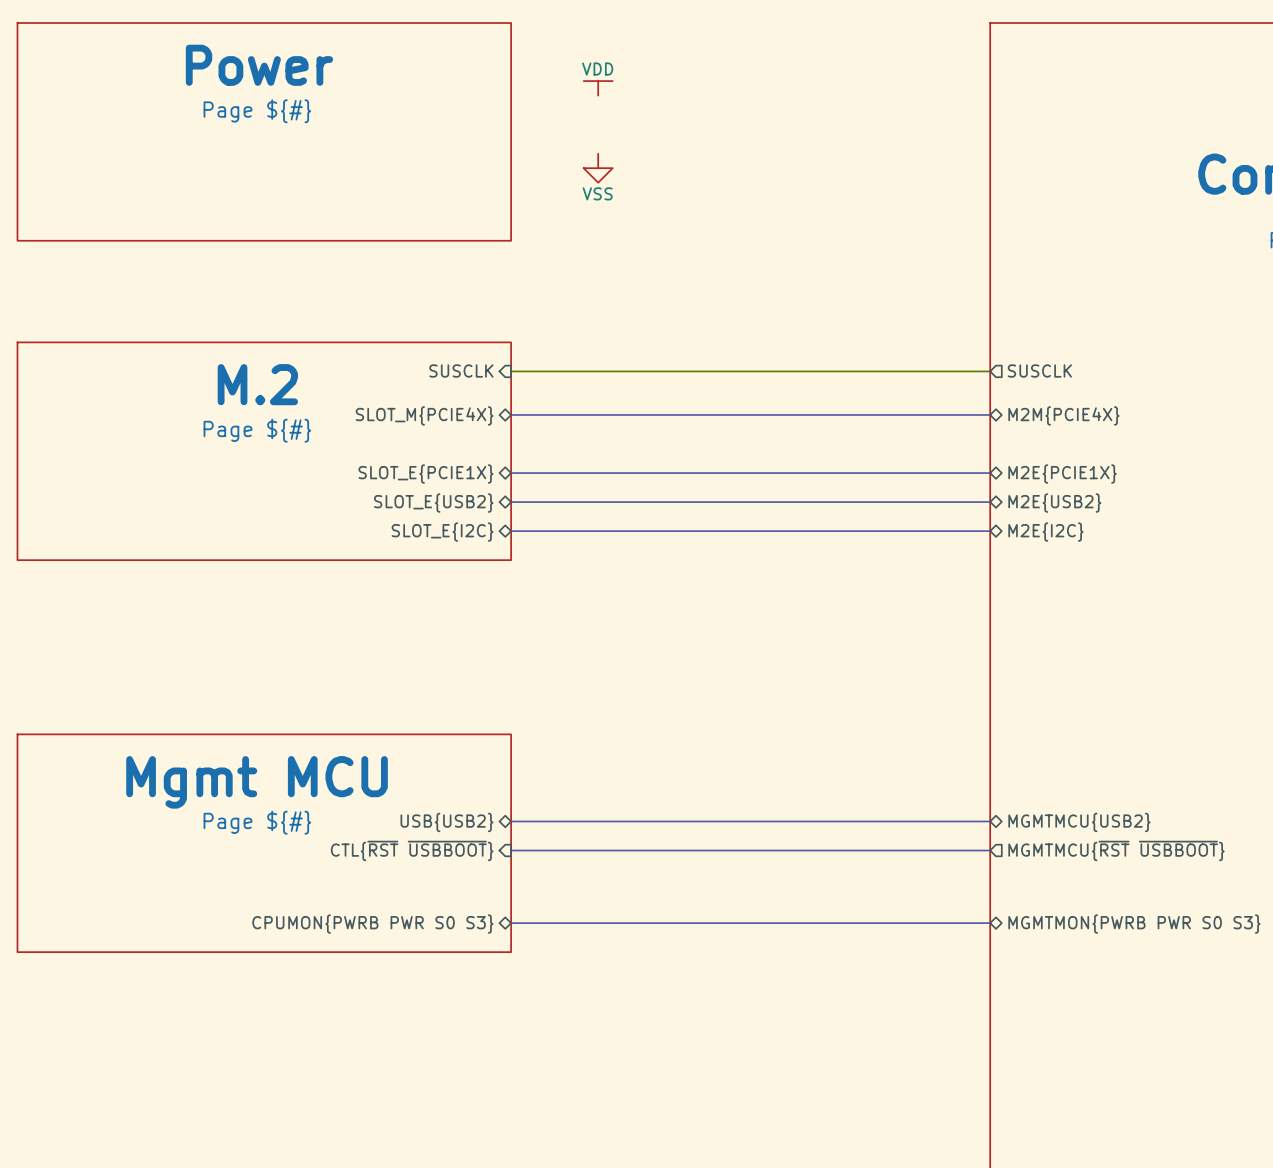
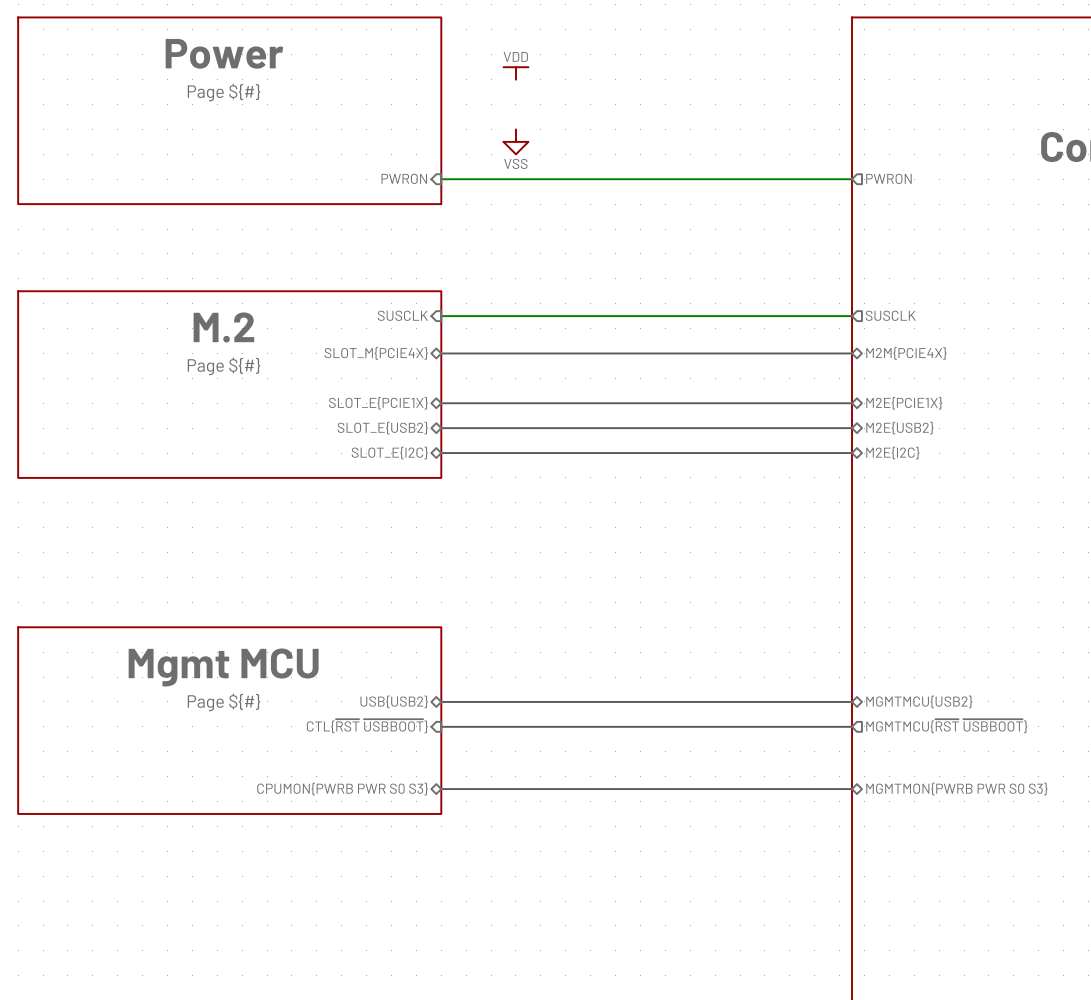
sheet pin: none -> PWRON (404, 178)
wire: none -> (441, 179) (852, 179)
sheet pin: none -> PWRON (888, 178)

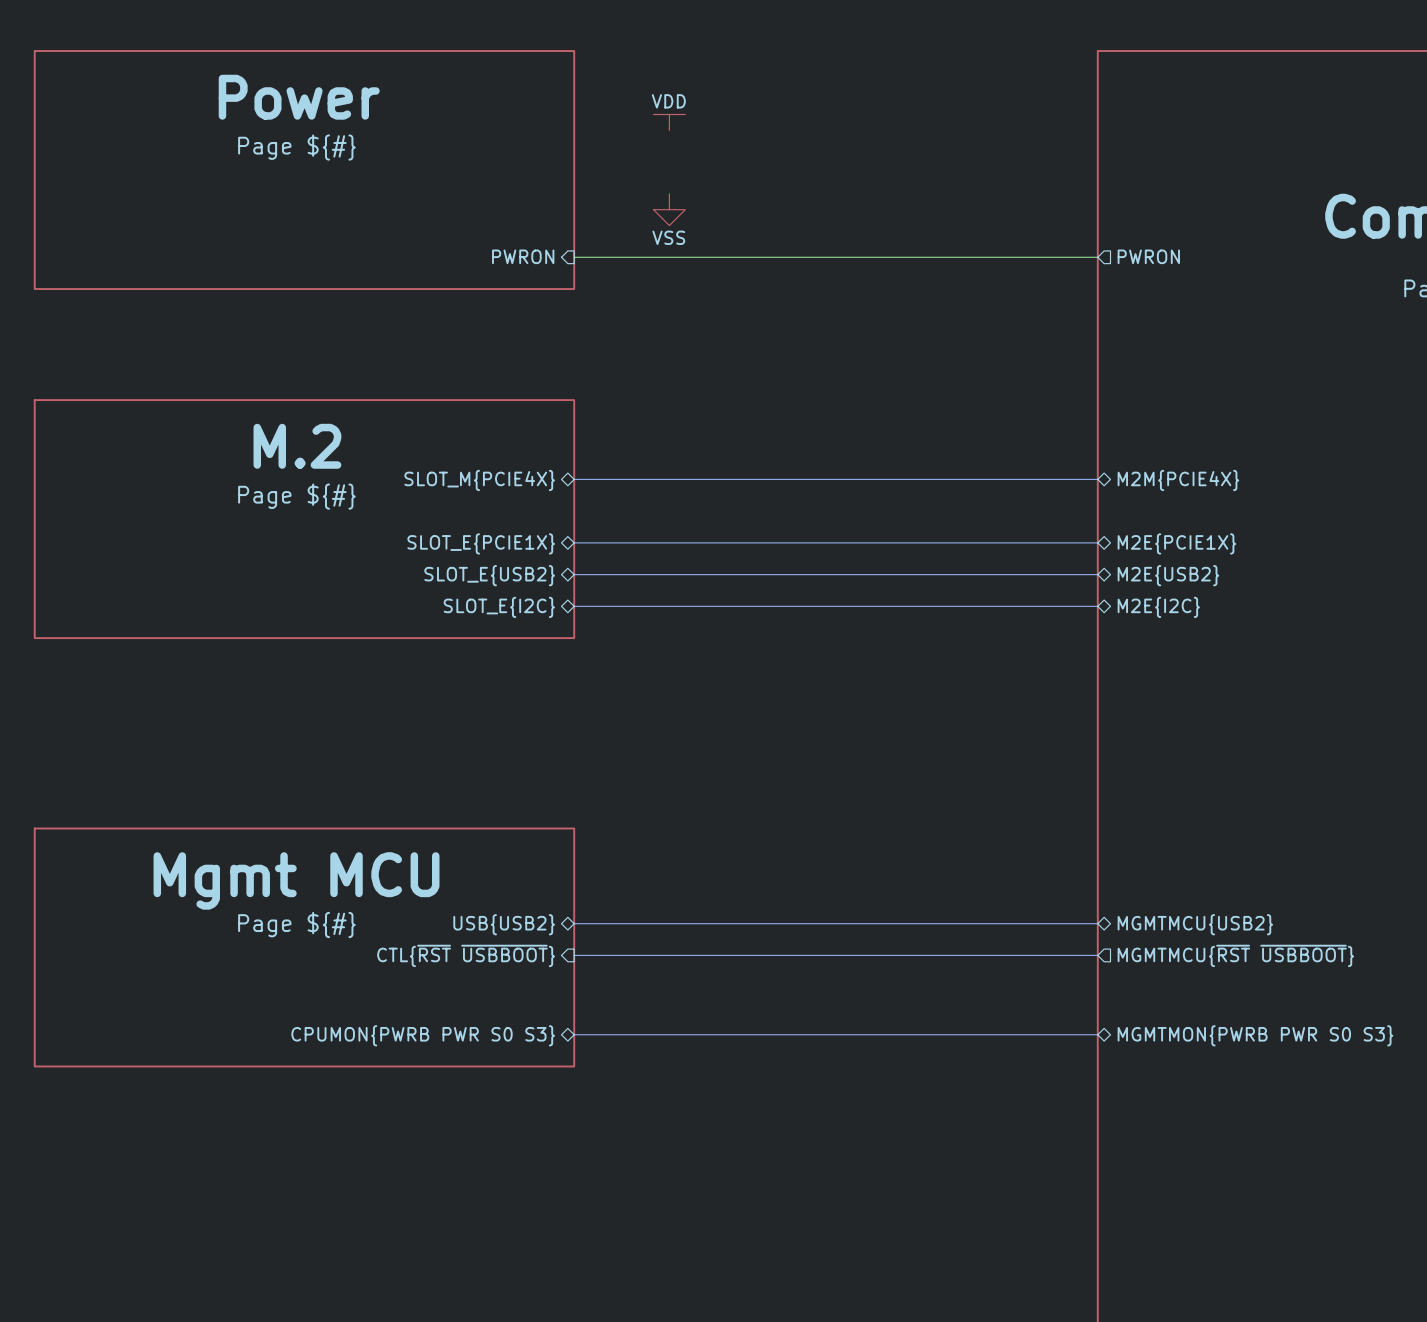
sheet pin: SUSCLK (402, 315) -> none
sheet pin: SUSCLK (890, 315) -> none
wire: (441, 316) (852, 316) -> none

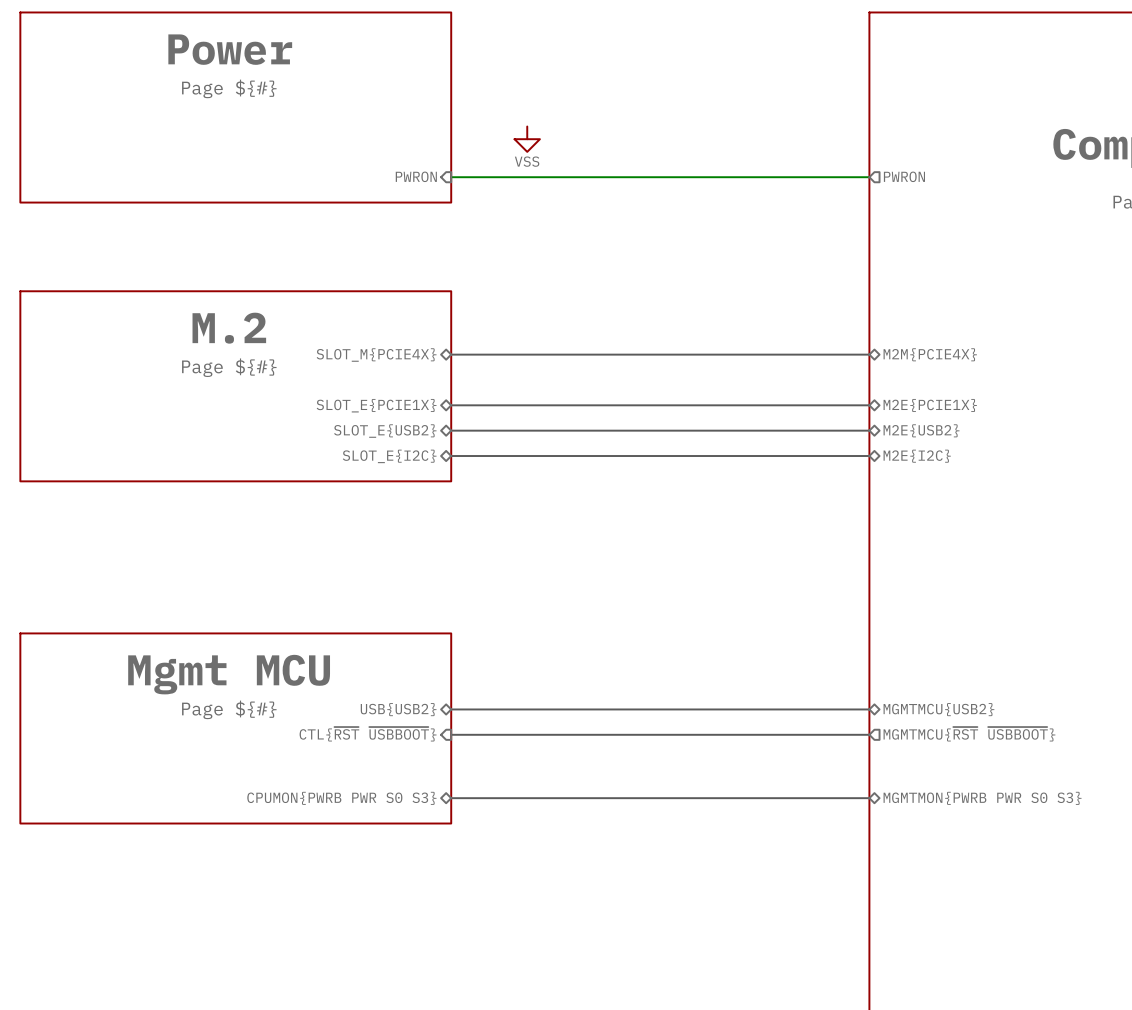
power symbol: VDD (669, 122) -> none

